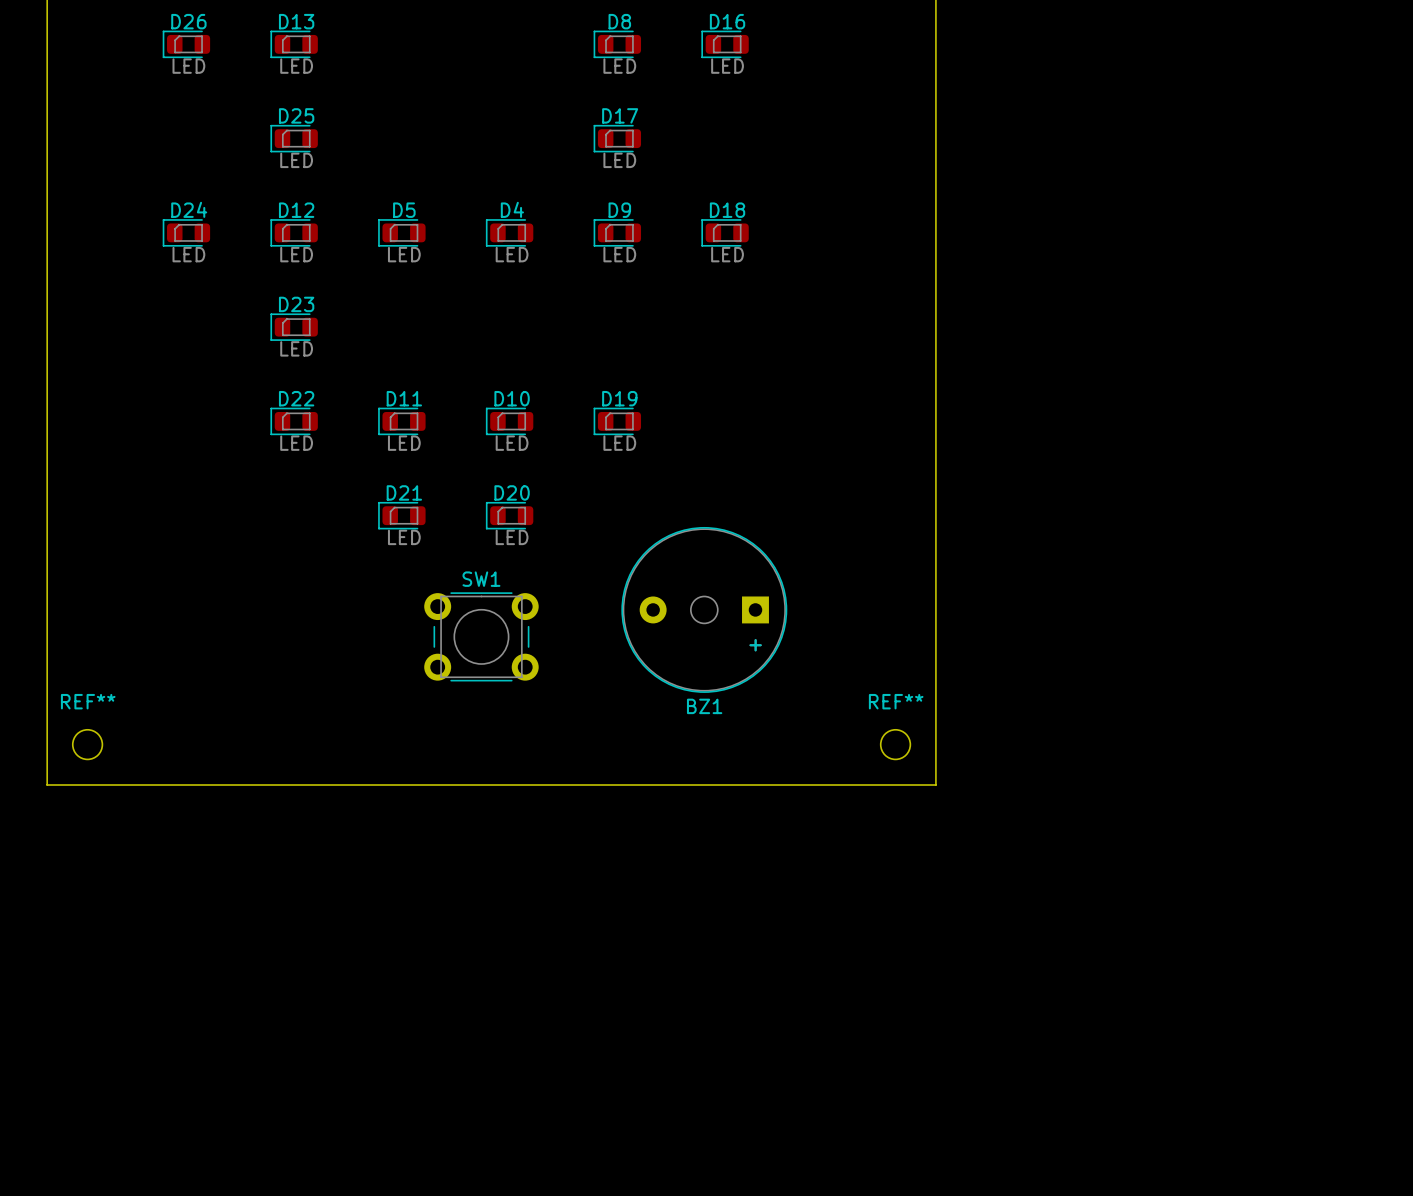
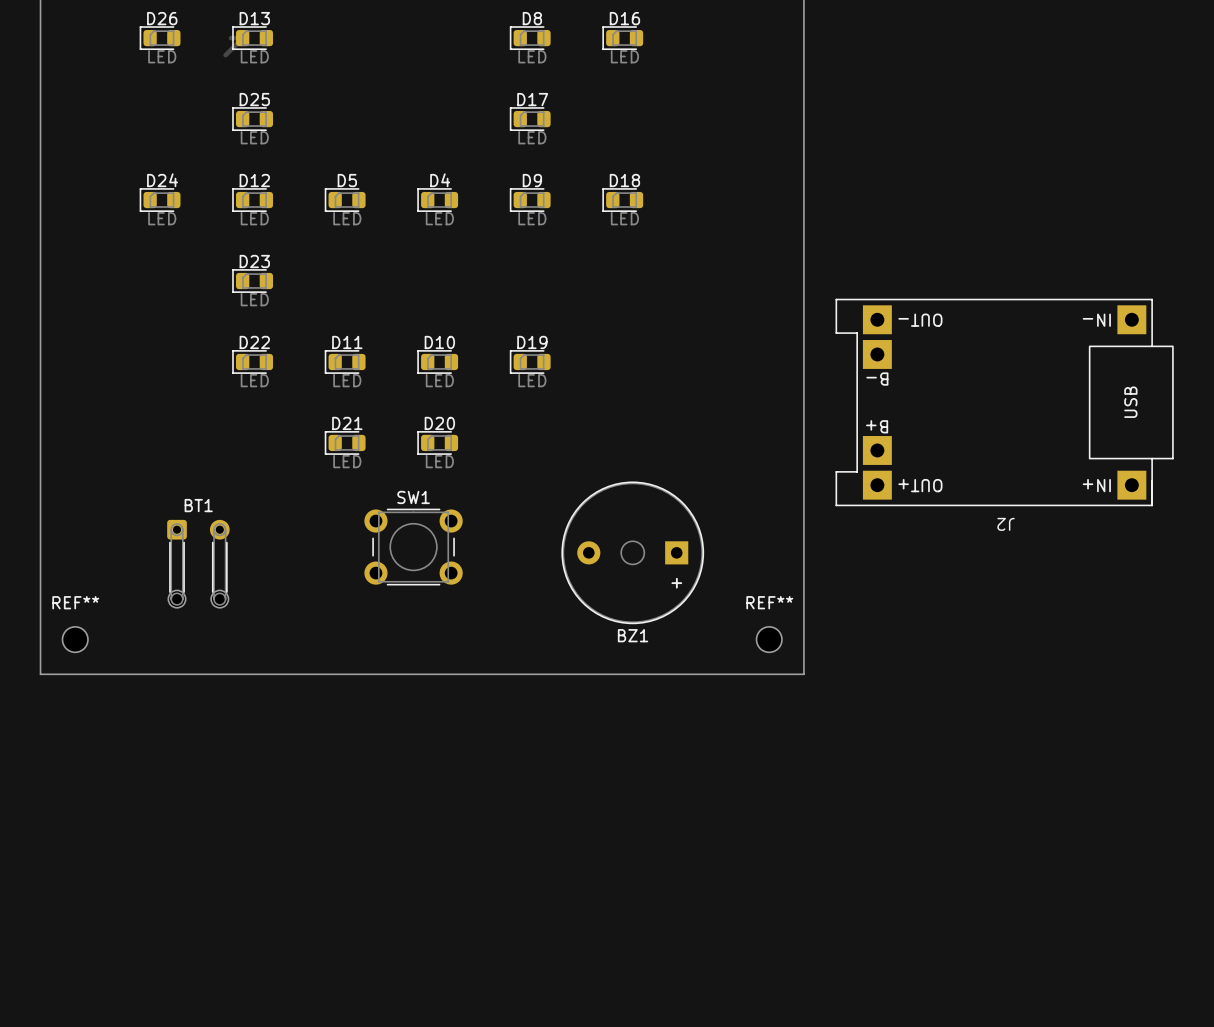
track: none -> (231, 38) (242, 38) (225, 55)
J2: none -> (1004, 402)
BZ1 position: (704, 609) -> (632, 552)
BT1: none -> (198, 563)

